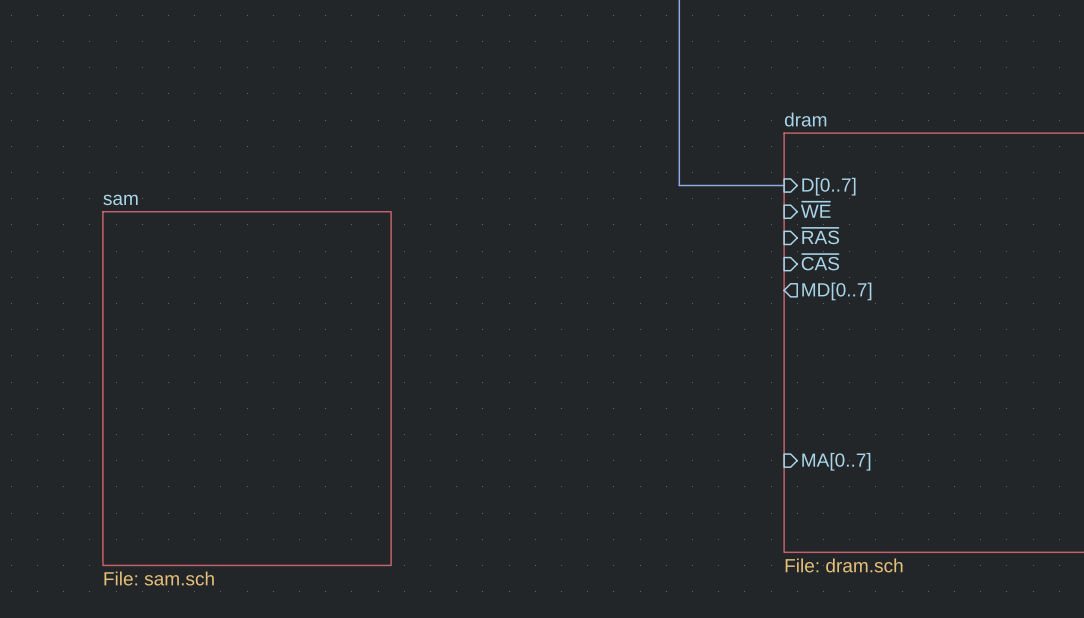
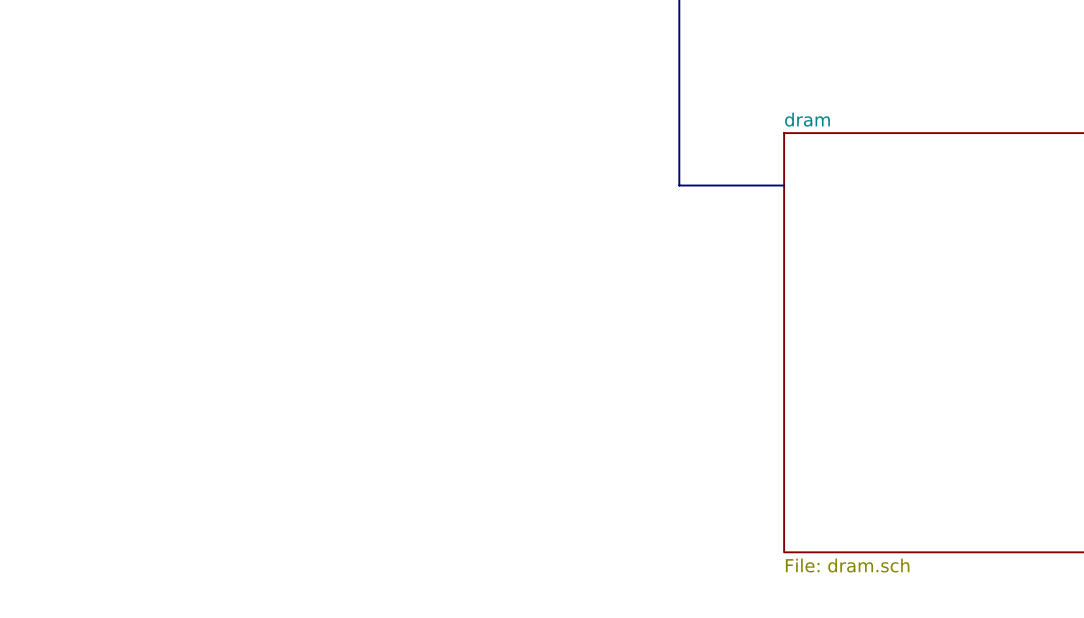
sheet pin: D[0..7] (828, 186) -> none
sheet pin: ~{WE} (815, 209) -> none
sheet pin: ~{RAS} (820, 236) -> none
sheet pin: ~{CAS} (820, 262) -> none
sheet pin: MD[0..7] (836, 291) -> none
sheet sam: File: sam.sch (247, 388) -> none
sheet pin: MA[0..7] (836, 461) -> none

